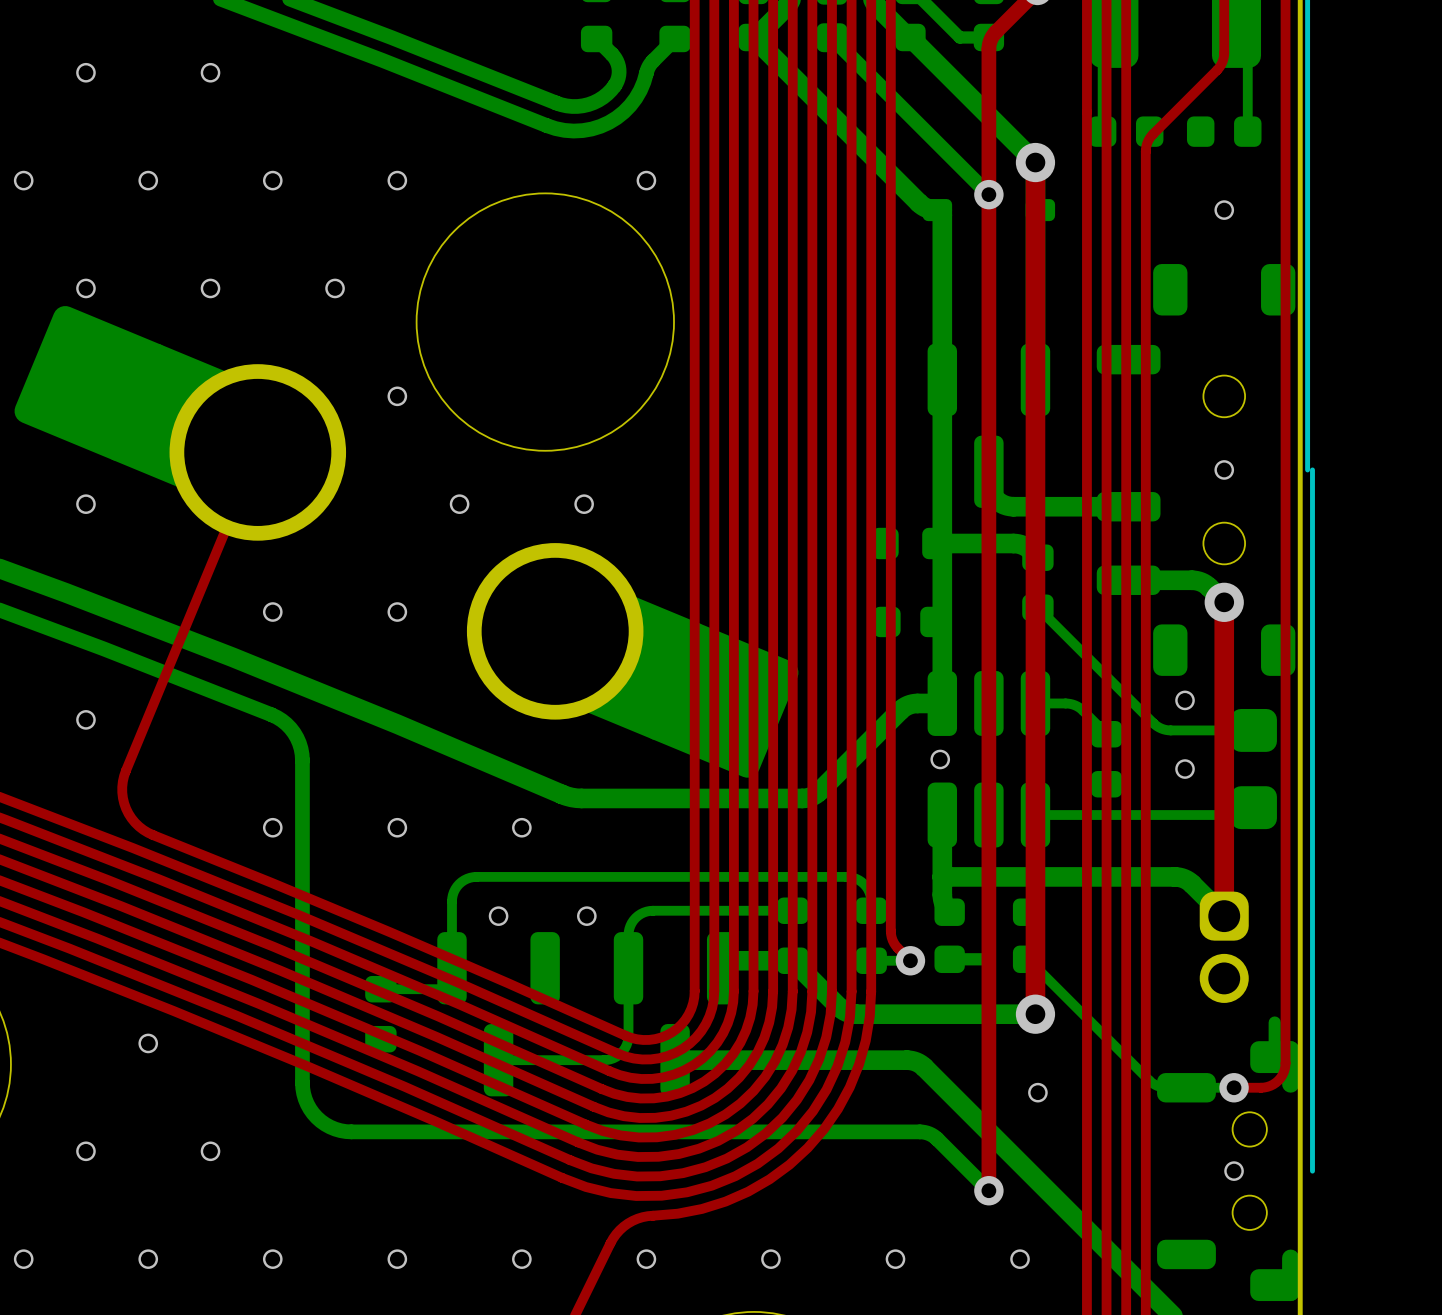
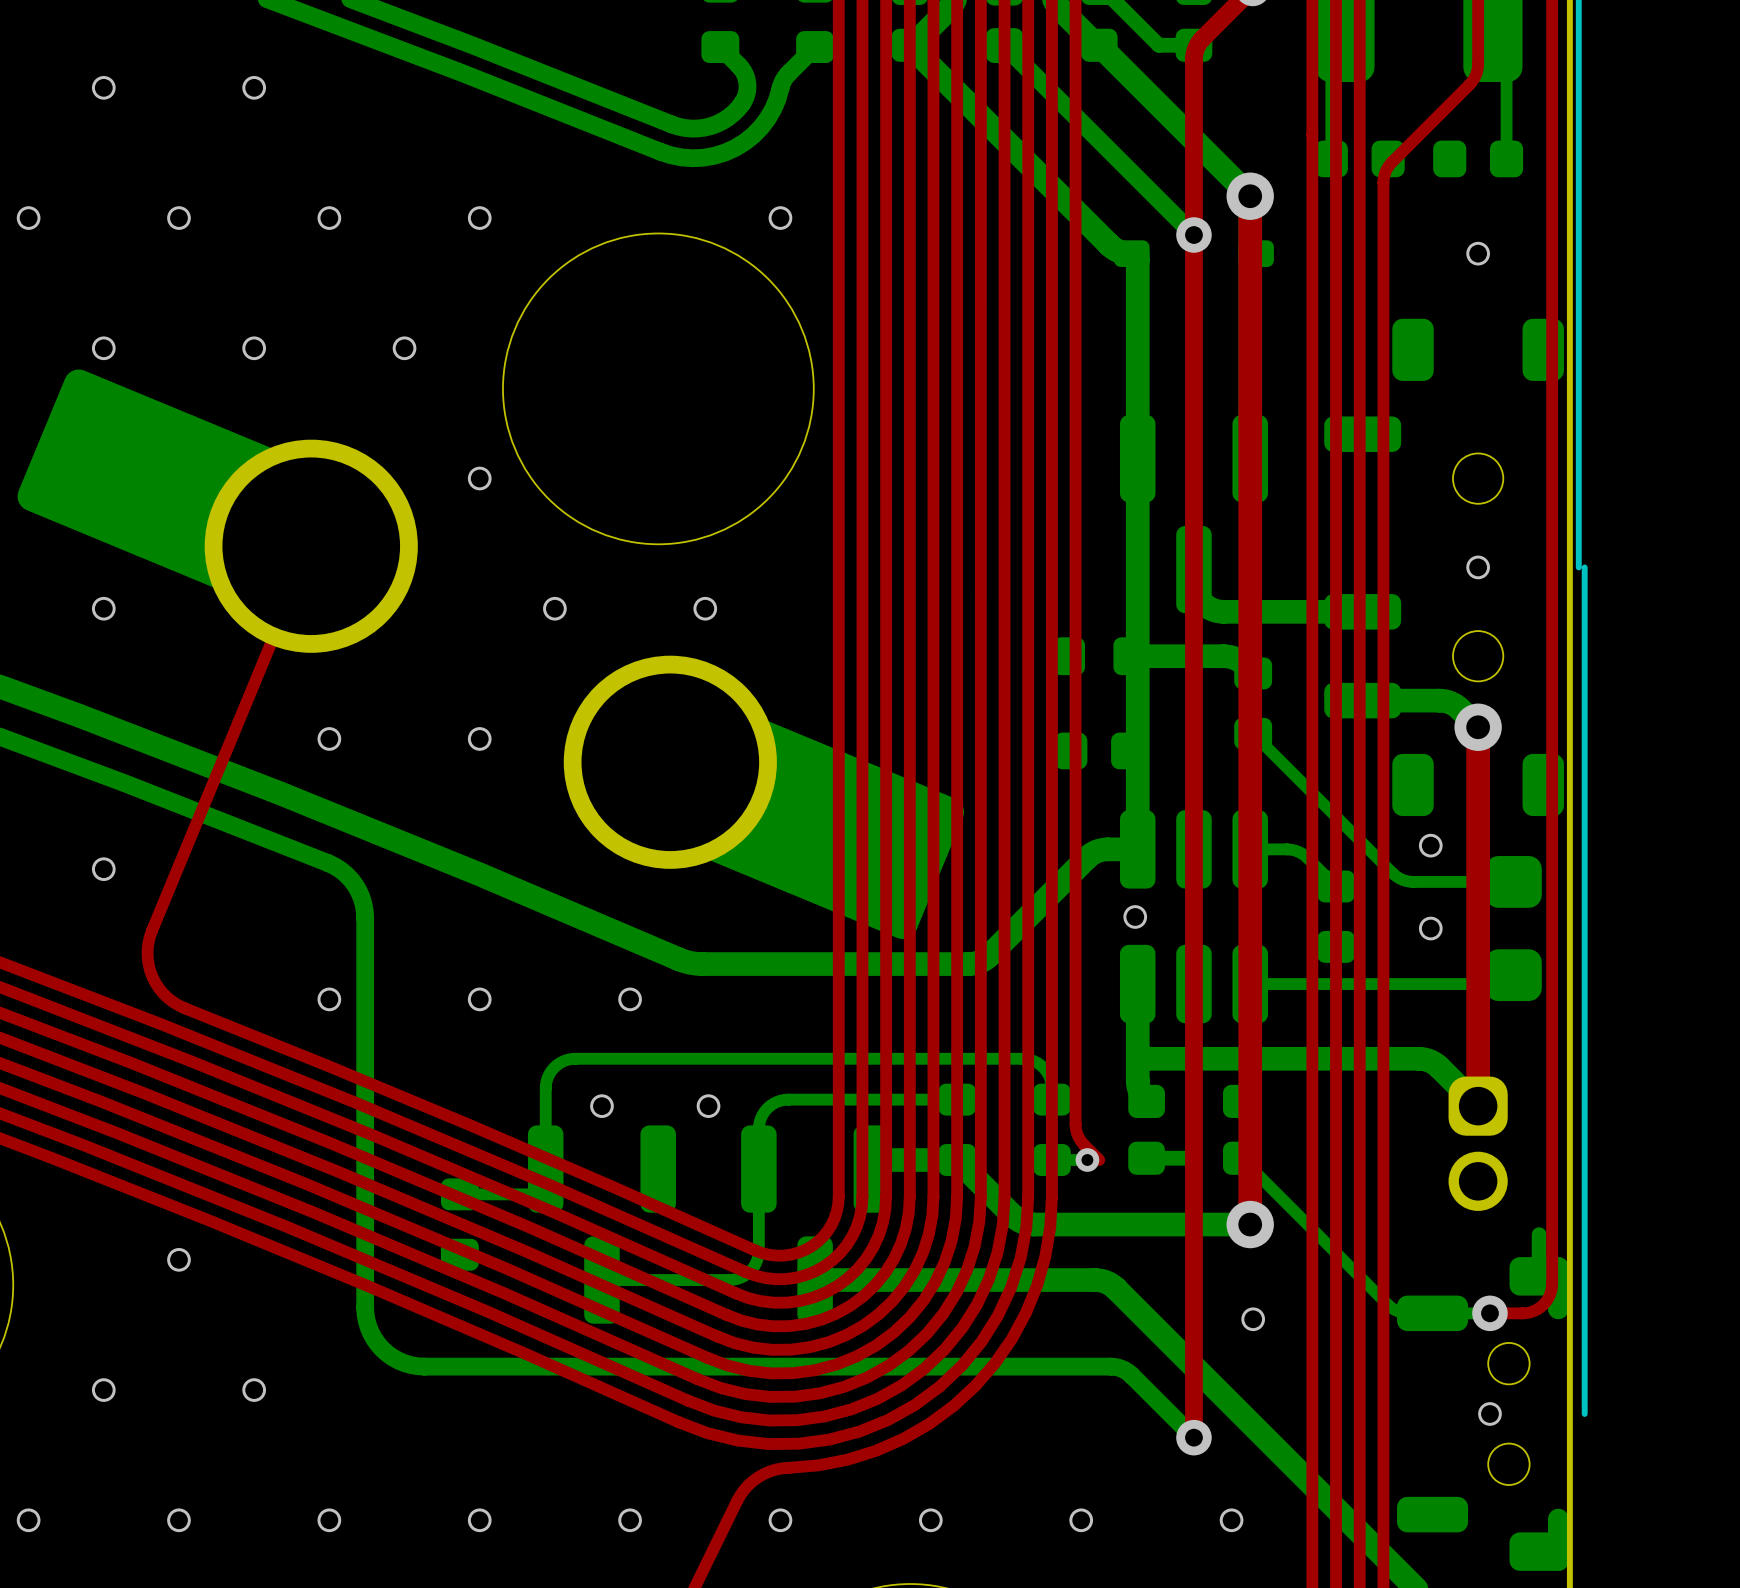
via size: [895, 946, 926, 976] -> [1075, 1148, 1100, 1172]

